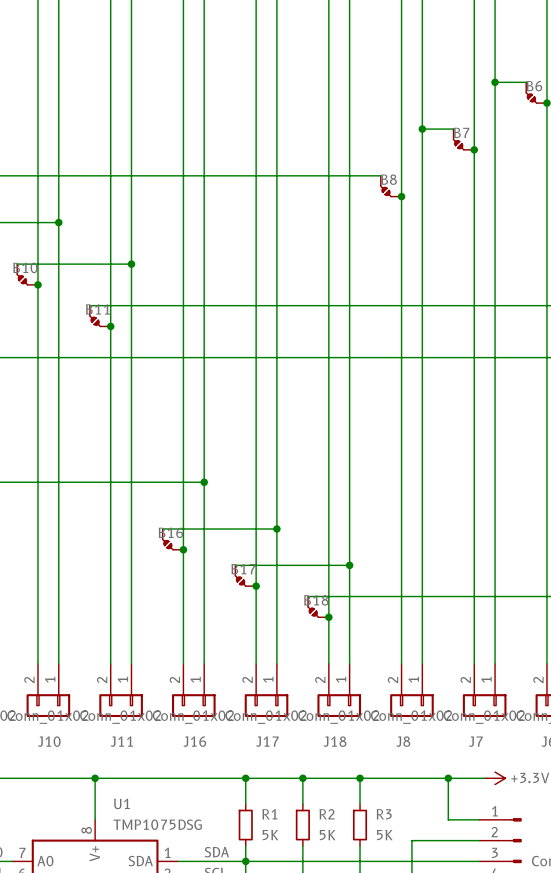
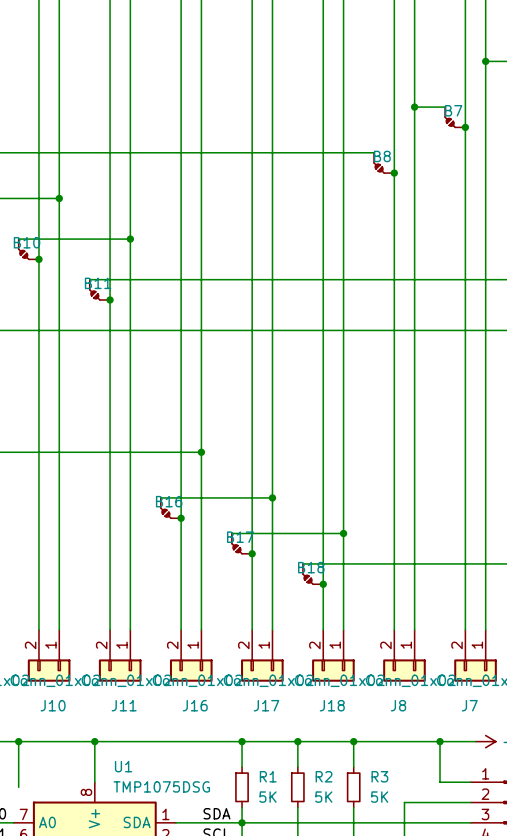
wire: none -> (18, 741) (18, 787)
junction: none -> (18, 741)

